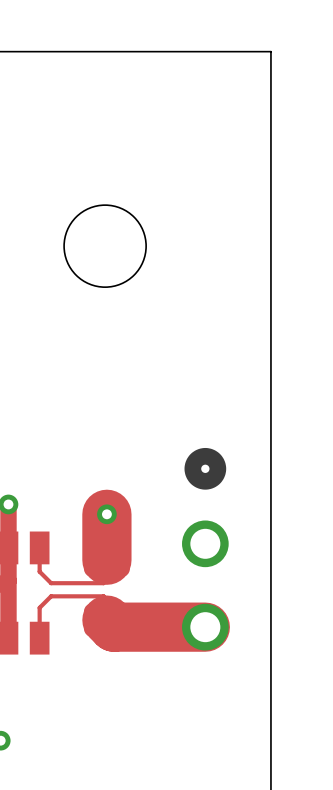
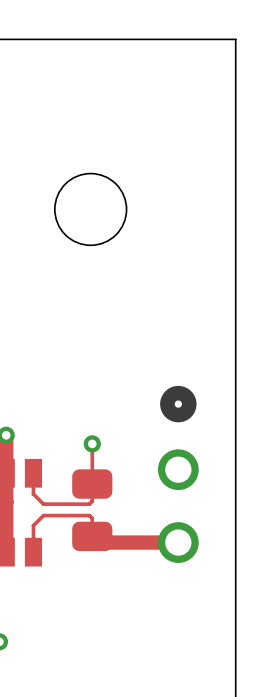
top track width: thick (106, 514) (106, 560) -> thin (92, 443) (92, 484)
top track width: thick (106, 620) (113, 627) (205, 627) -> thin (92, 536) (98, 542) (178, 542)

